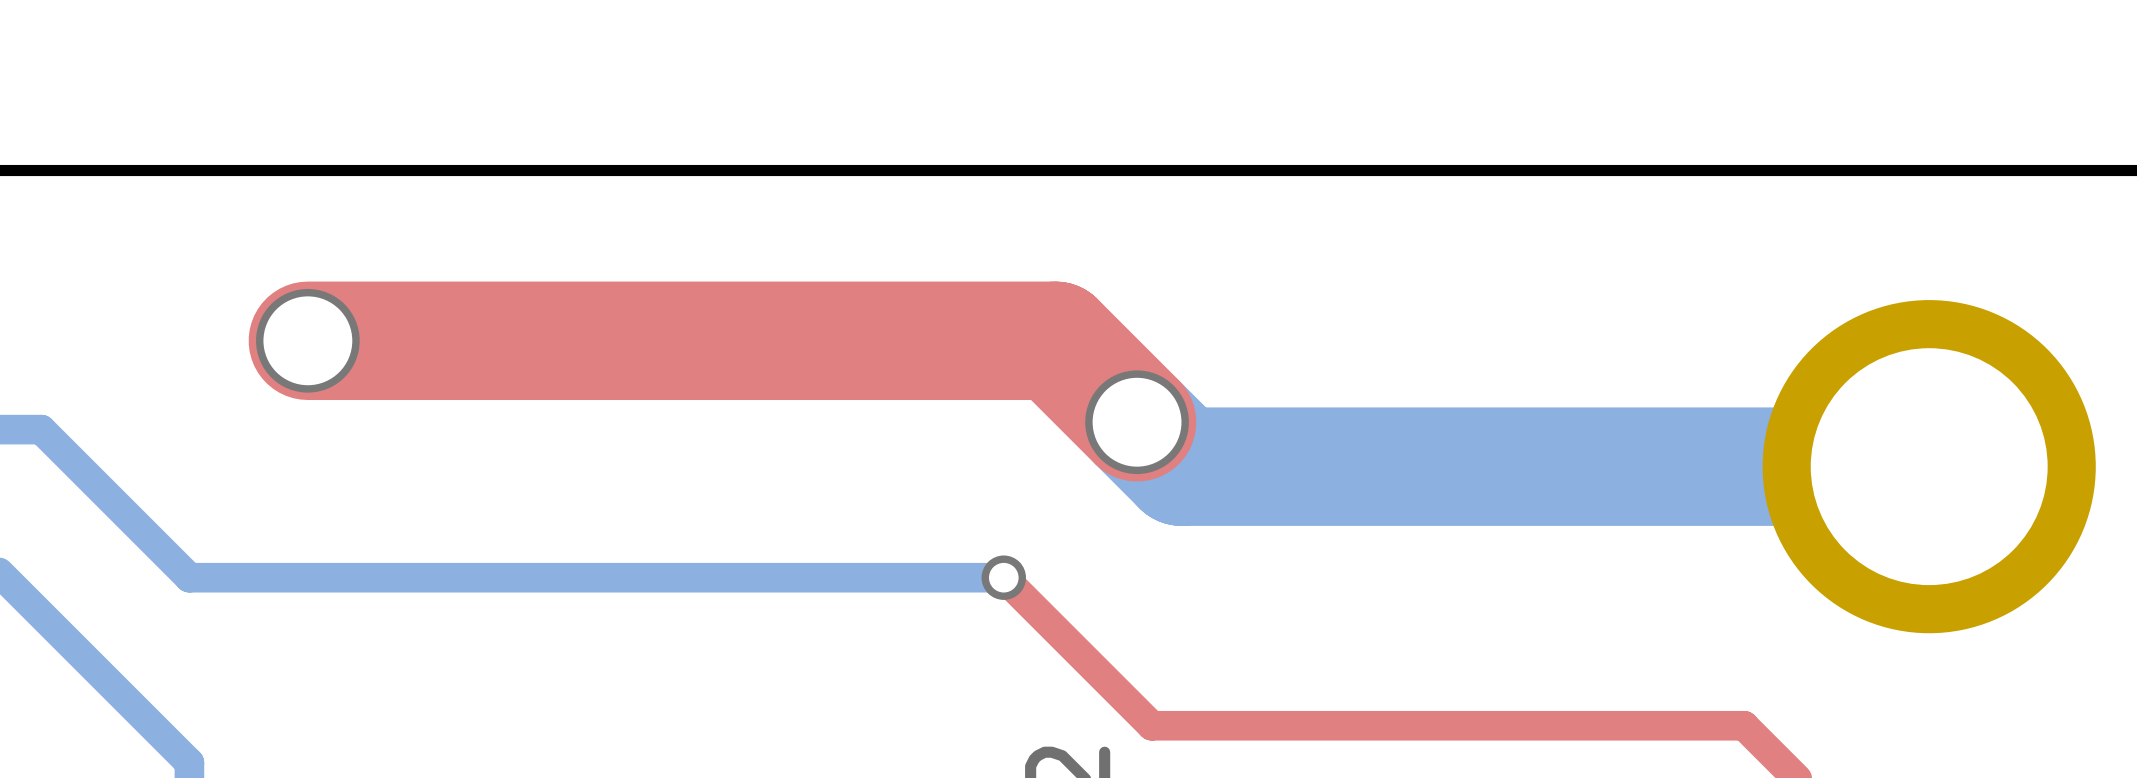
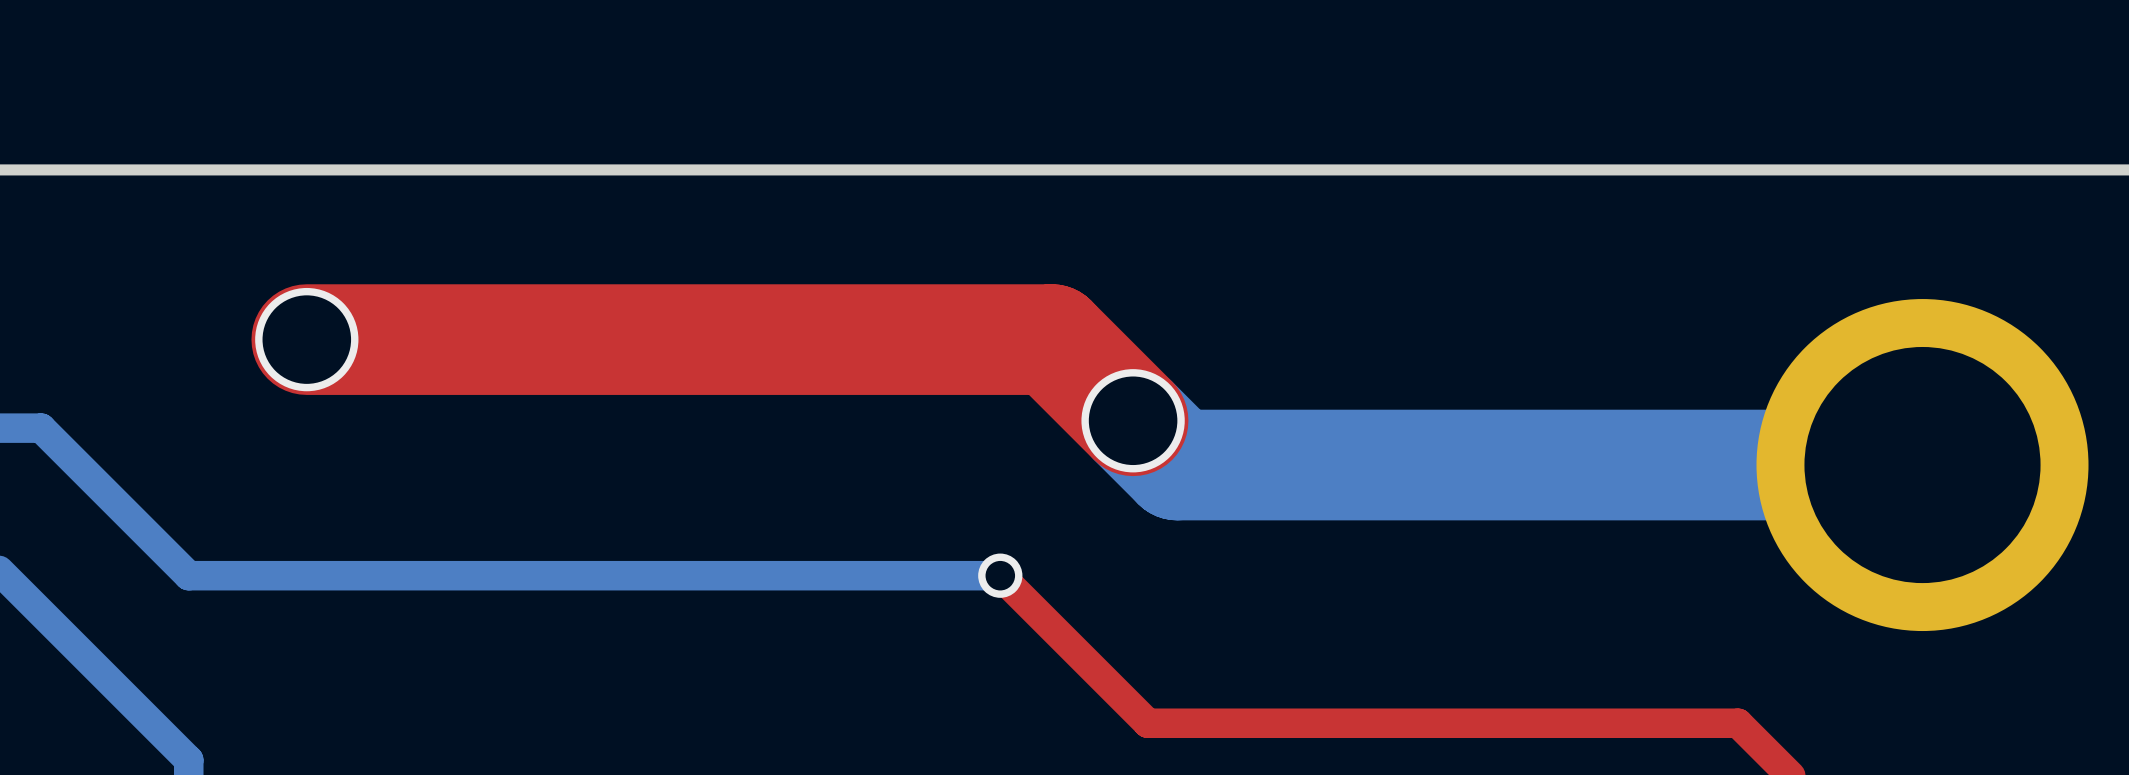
top track width: thick (307, 340) (1055, 340) (1137, 422) -> thin (306, 339) (1051, 339) (1133, 420)
bottom track width: thick (1137, 422) (1181, 466) (1929, 466) -> thin (1133, 420) (1177, 465) (1922, 465)

